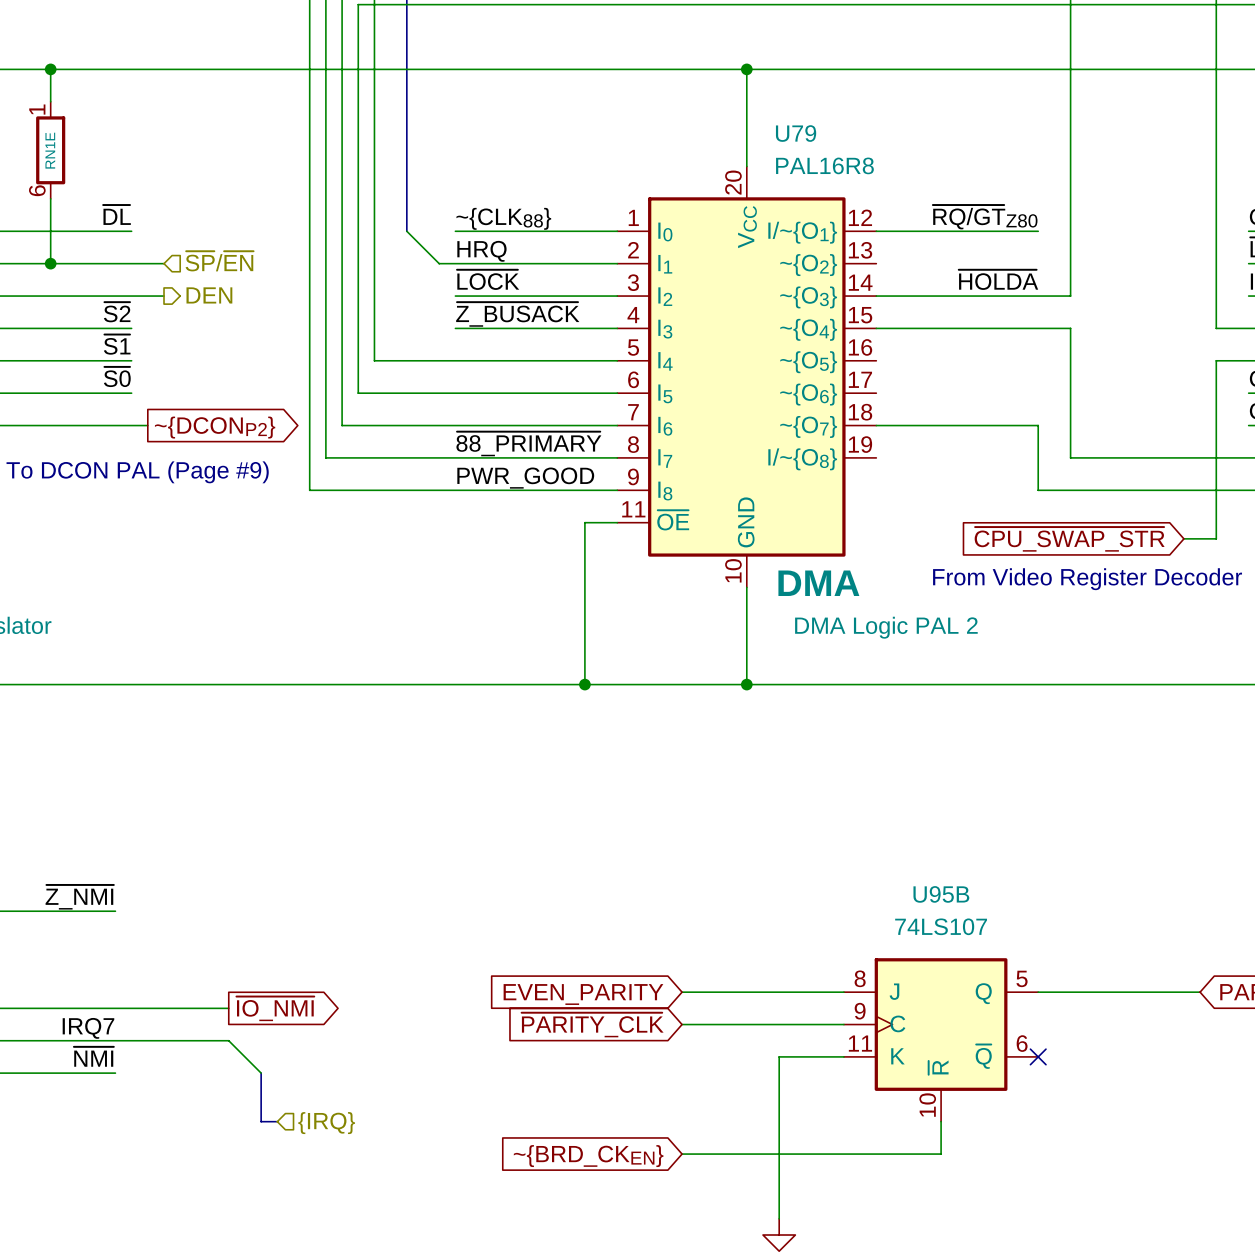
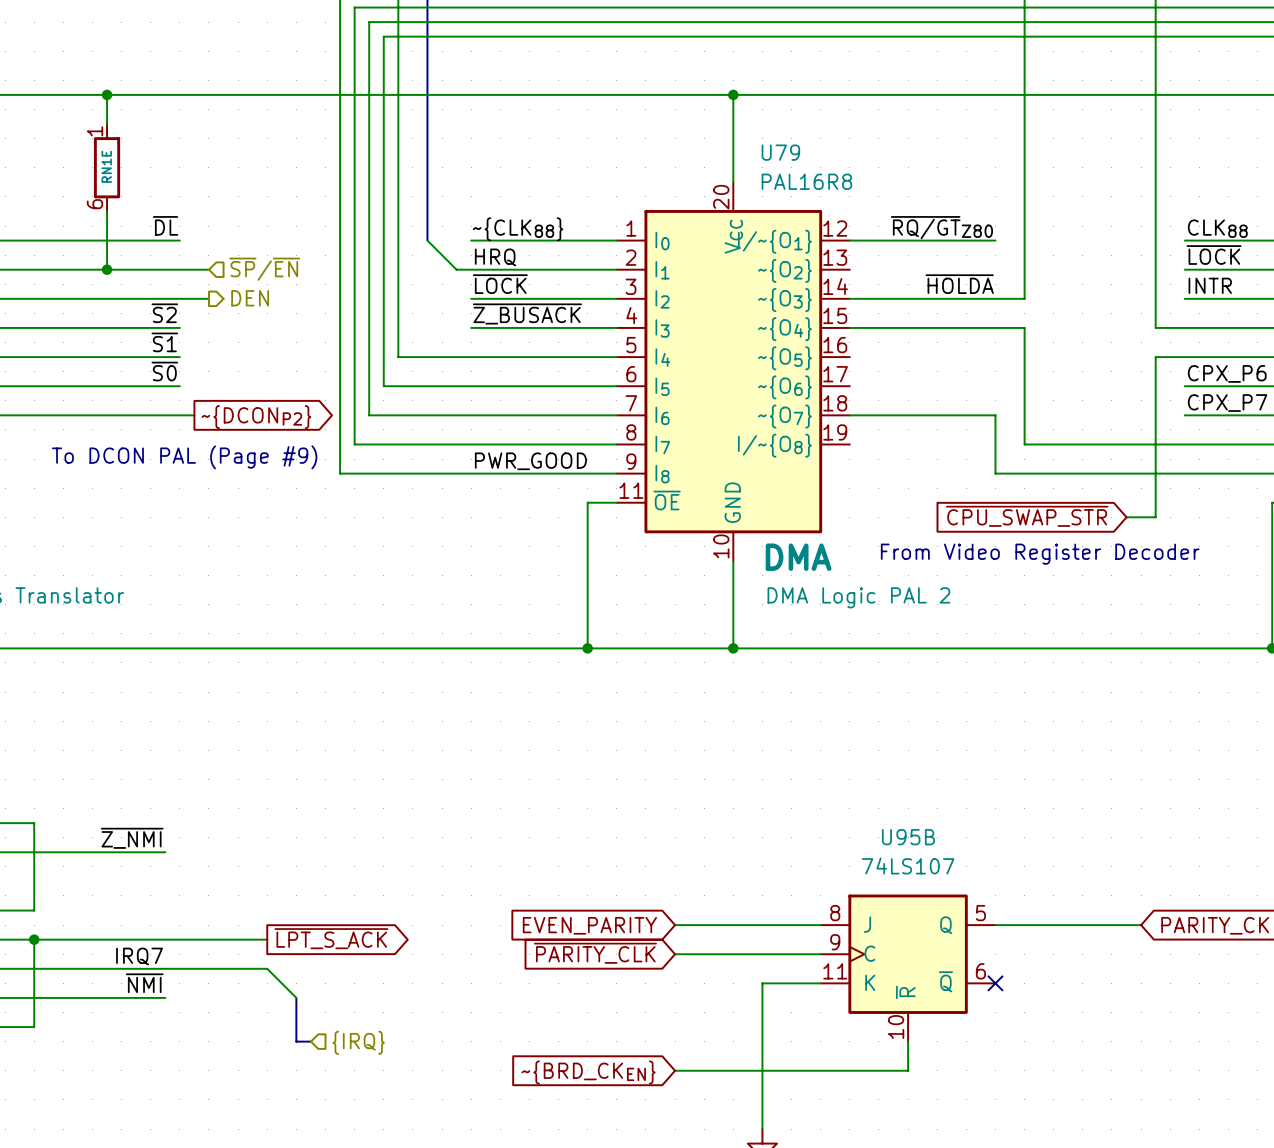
label: ~{88_PRIMARY} (528, 443) -> none
global label: ~{IO_NMI} (275, 1008) -> ~{LPT_S_ACK} (331, 938)

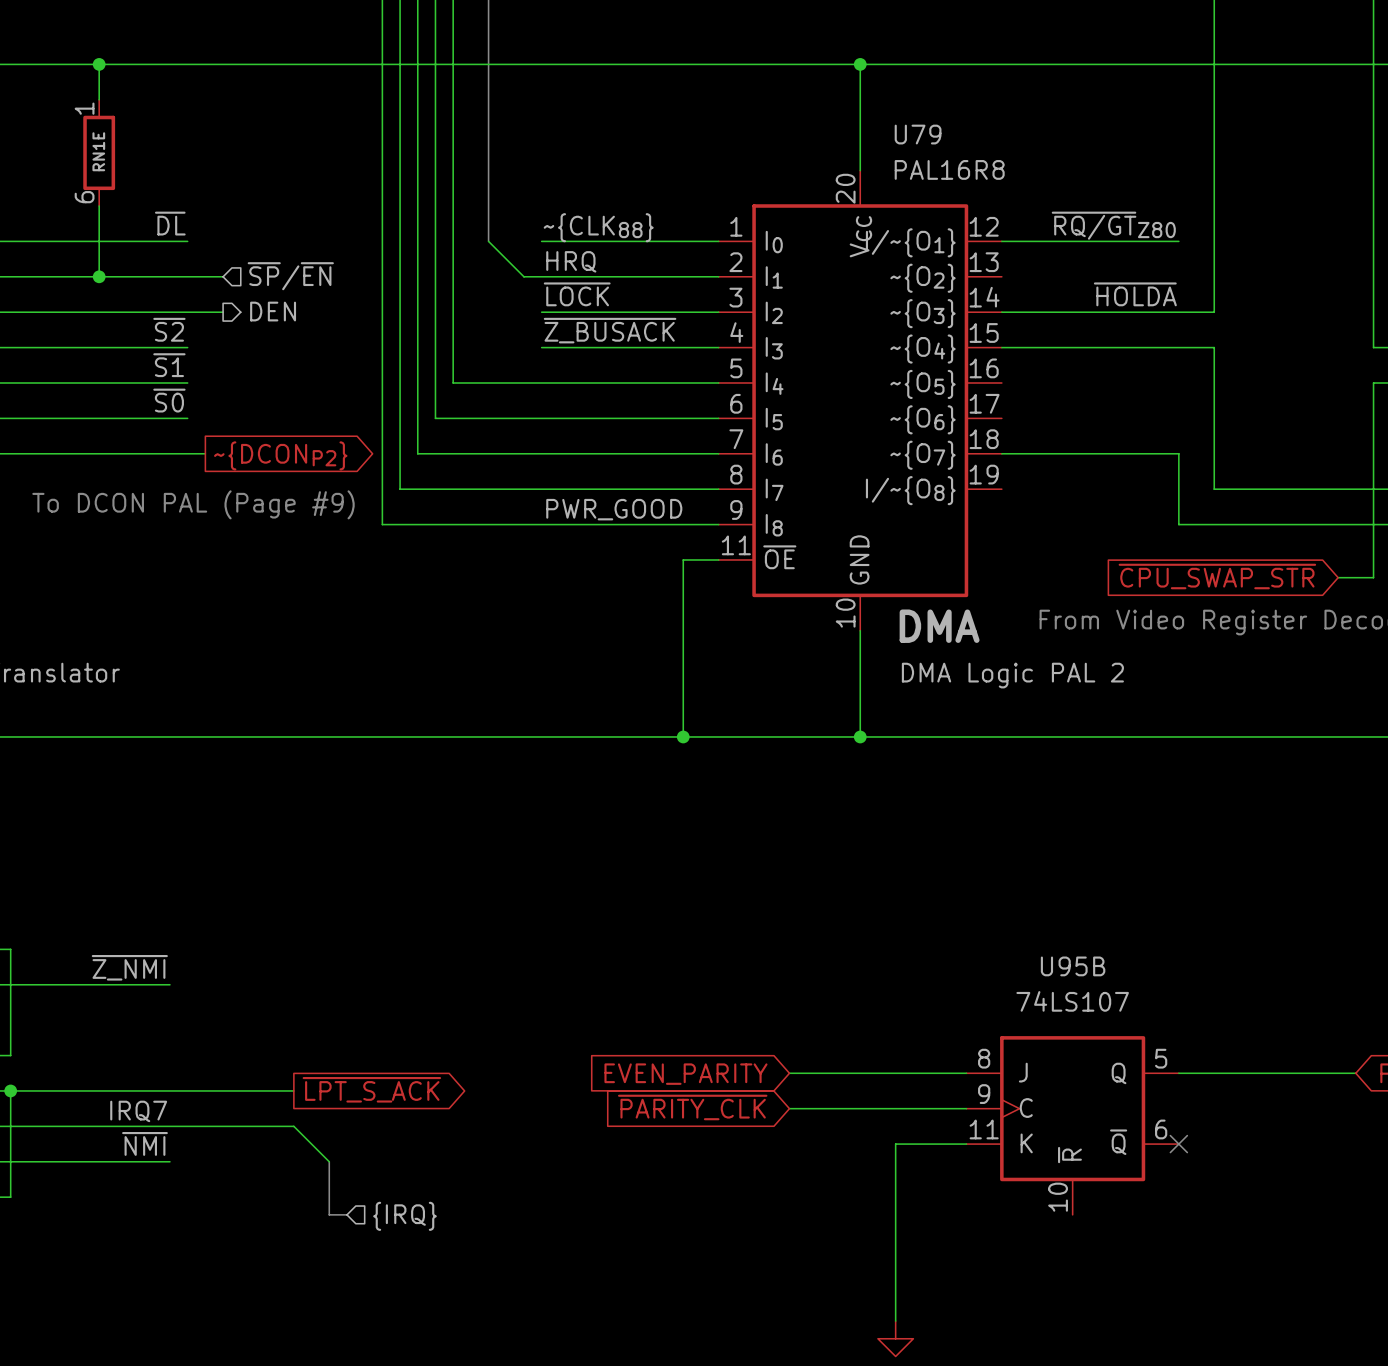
wire: (908, 1041) (908, 1070) (675, 1070) -> none
global label: ~{BRD_CKEN} (588, 1072) -> none

